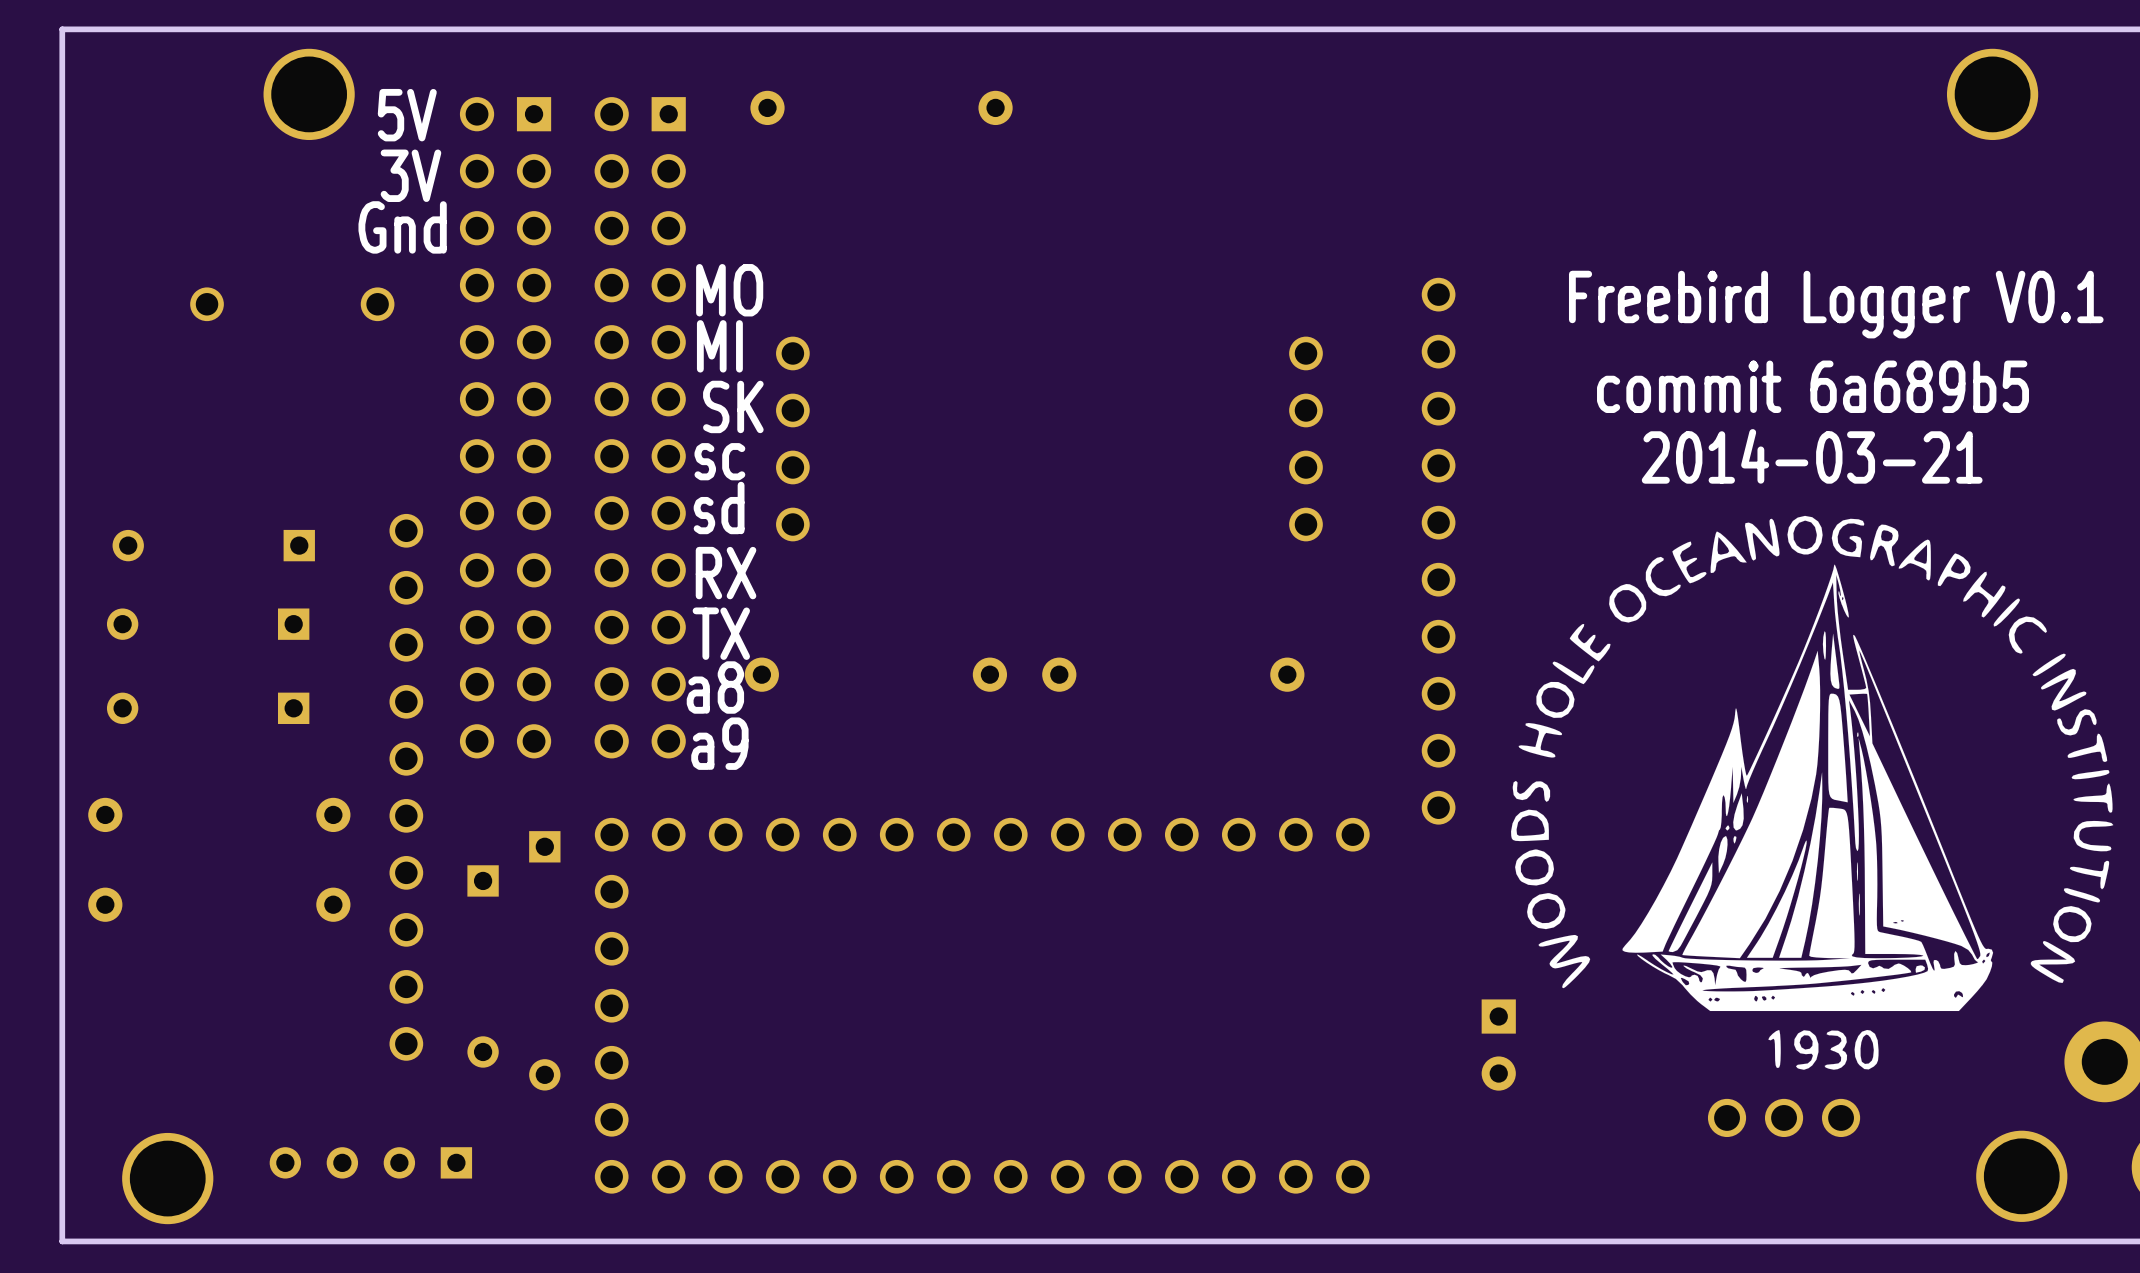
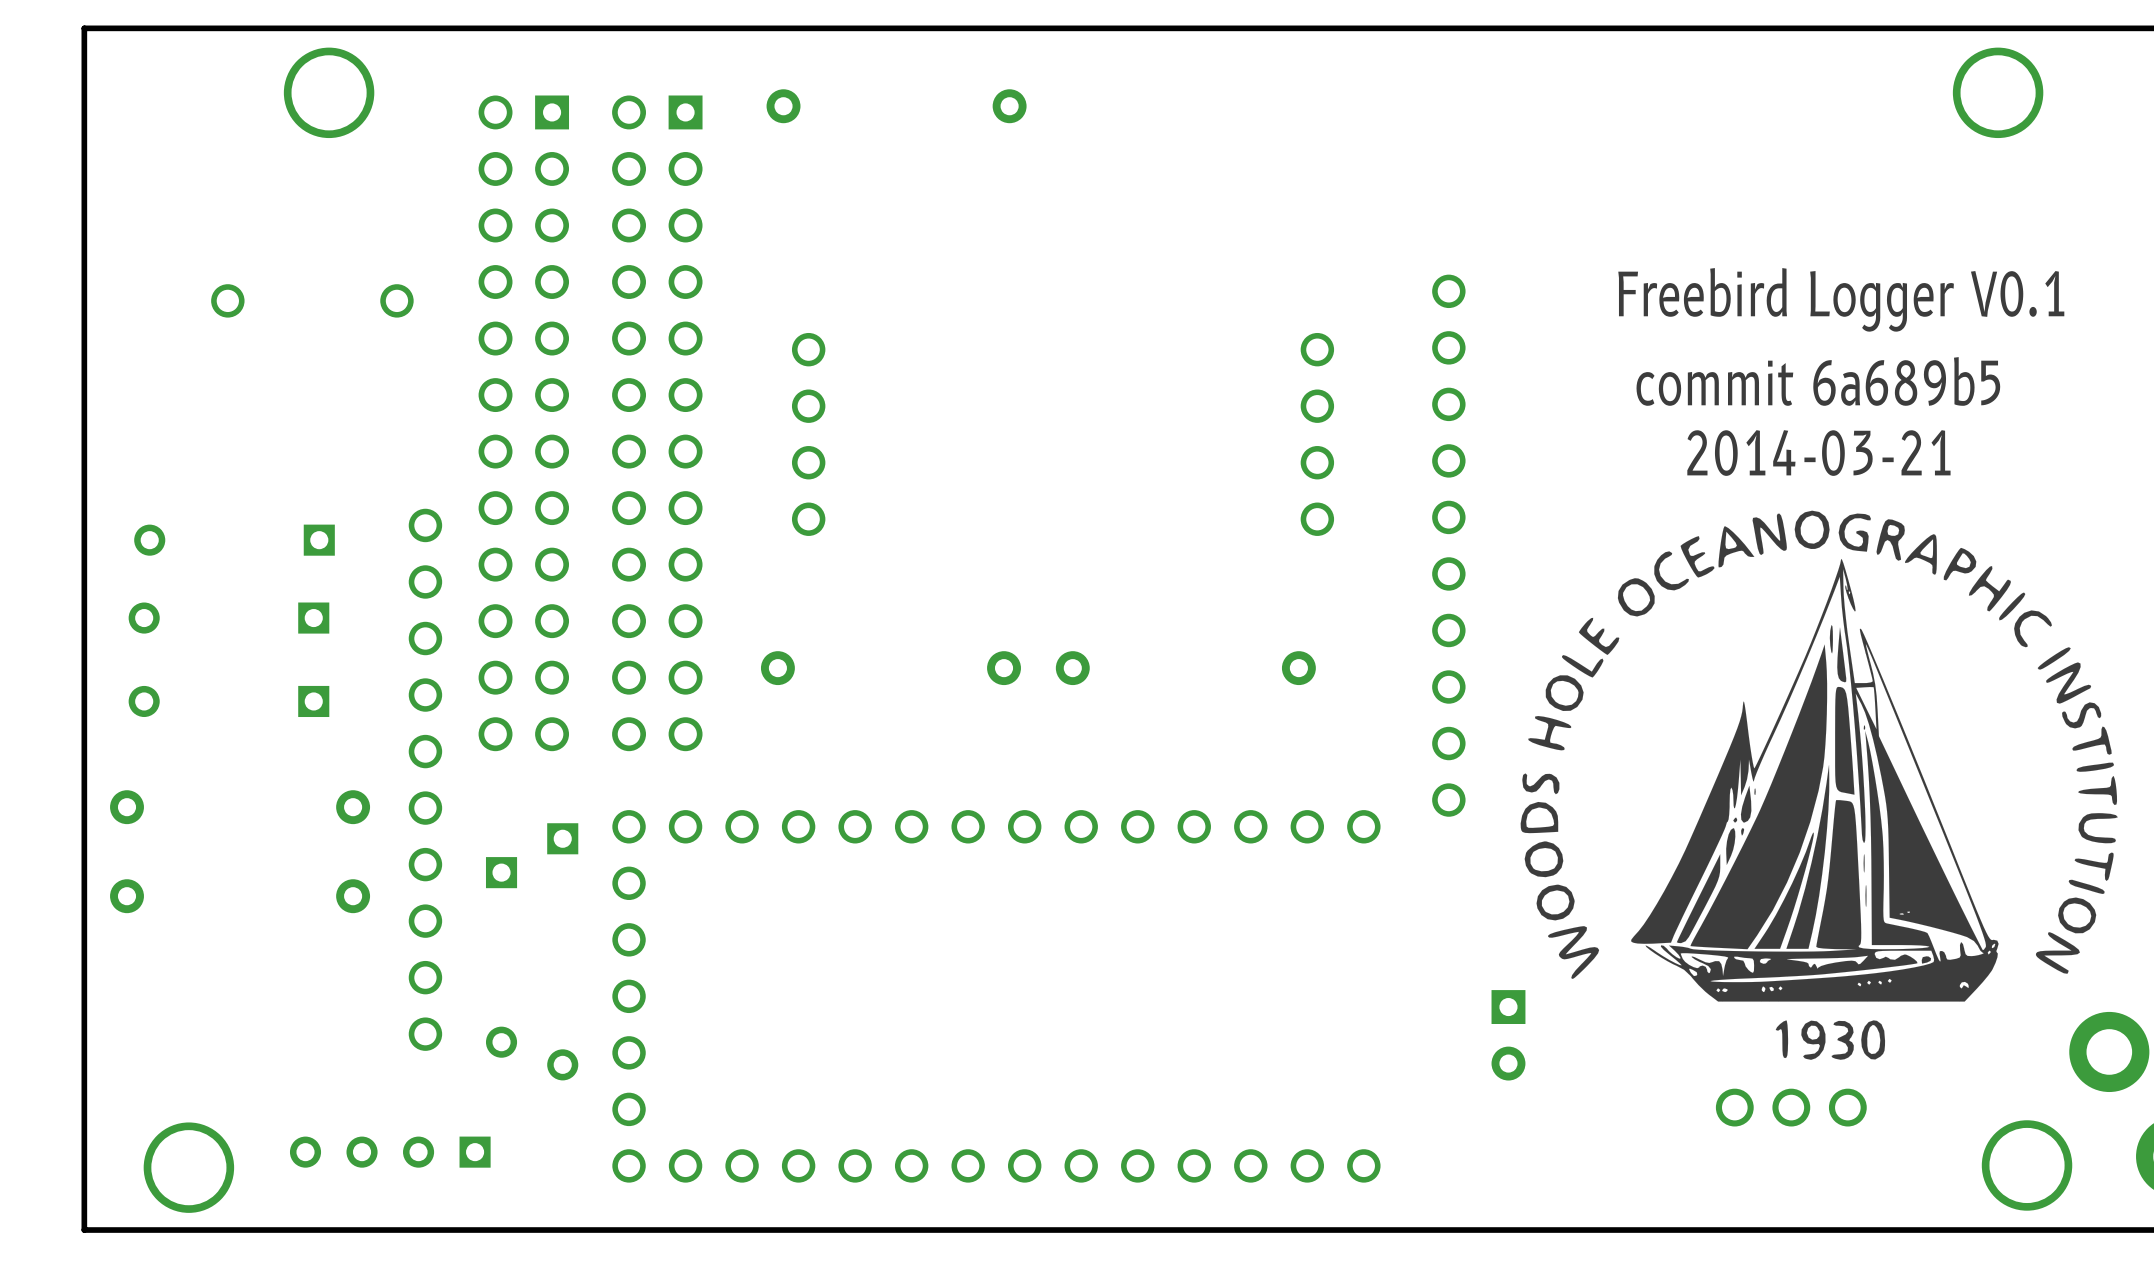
text: 5V (407, 115) -> none
text: 3V (410, 175) -> none
text: Gnd (402, 227) -> none
text: MO (729, 290) -> none
text: MI (719, 346) -> none
text: SK (733, 406) -> none
text: sc (719, 461) -> none
text: sd (719, 507) -> none
text: RX (726, 573) -> none
text: TX (721, 633) -> none
text: a8 (715, 687) -> none
text: a9 (719, 743) -> none

